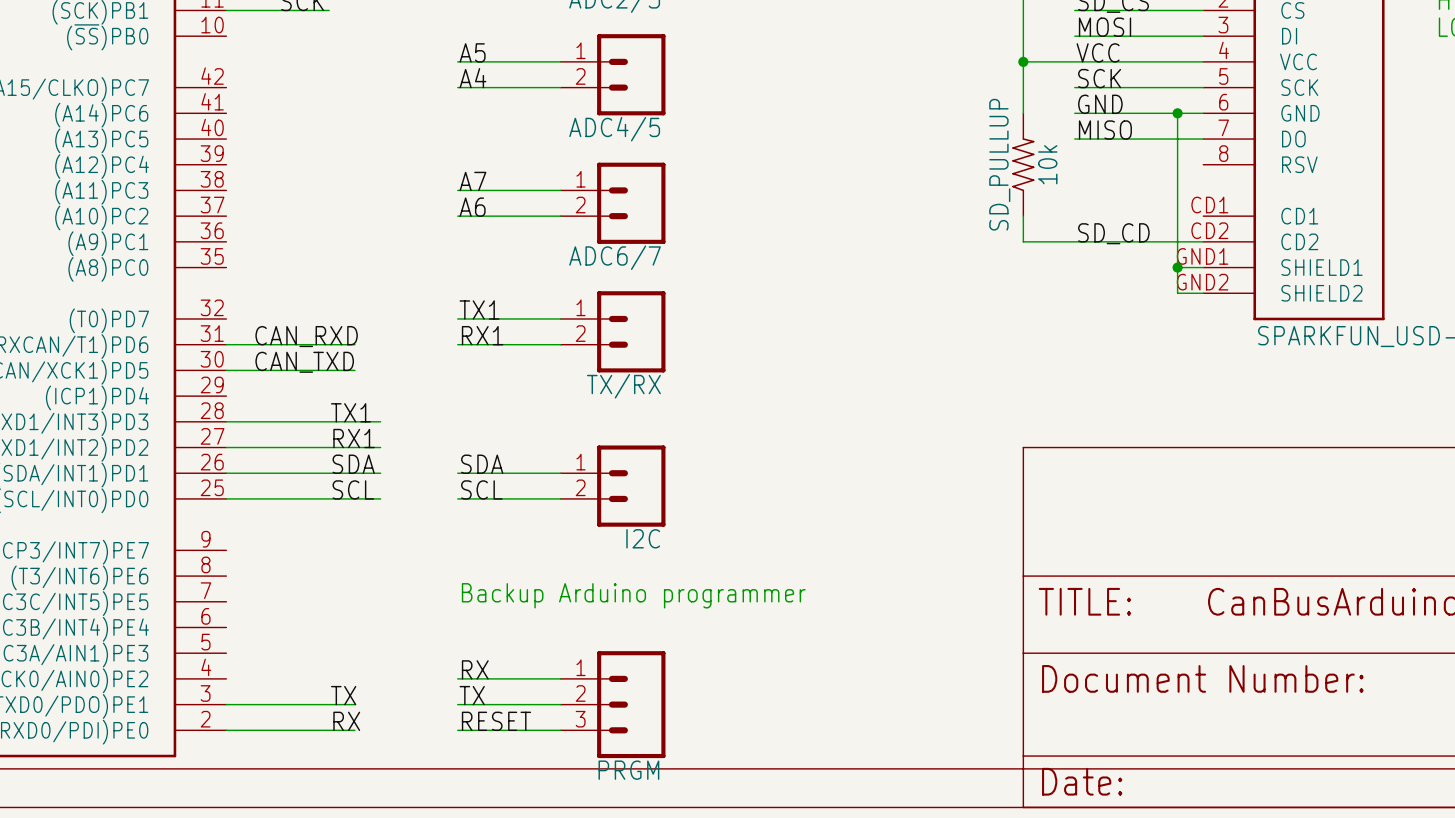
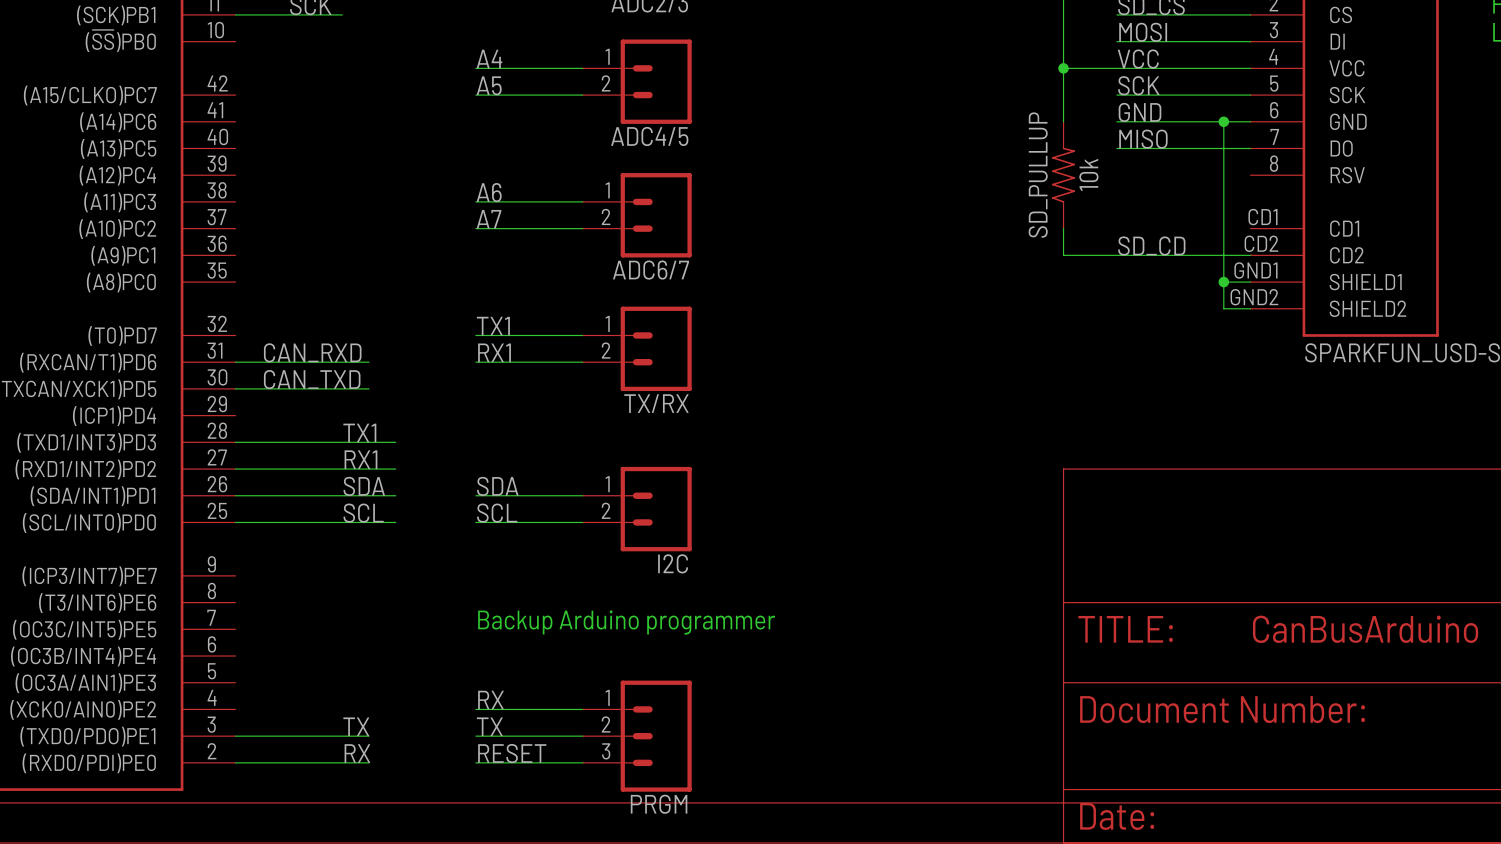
label: A5 (472, 52) -> A4 (489, 59)
label: A4 (472, 78) -> A5 (489, 85)
label: A7 (472, 181) -> A6 (489, 192)
label: A6 (472, 207) -> A7 (488, 219)

